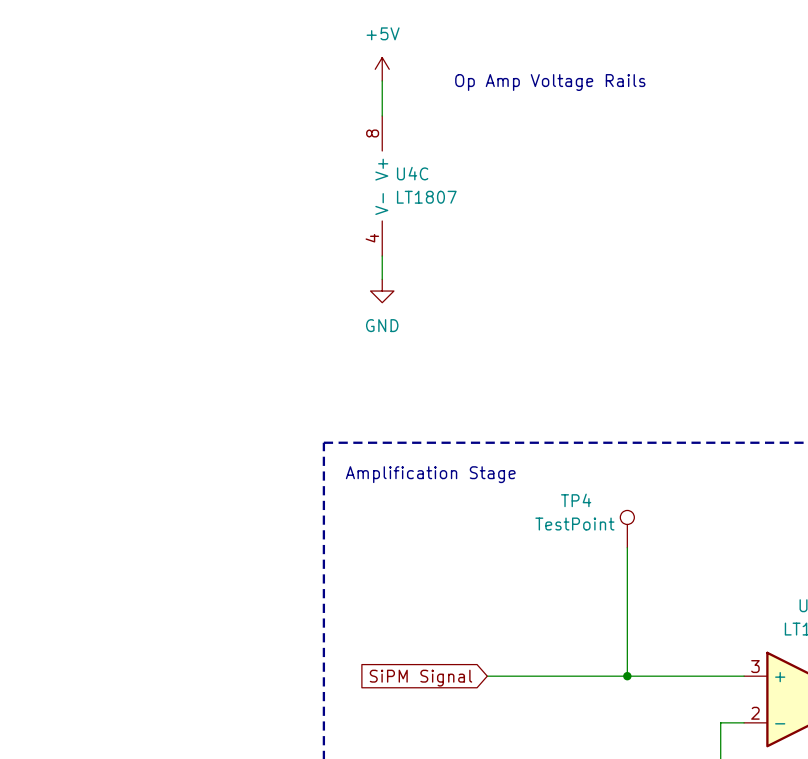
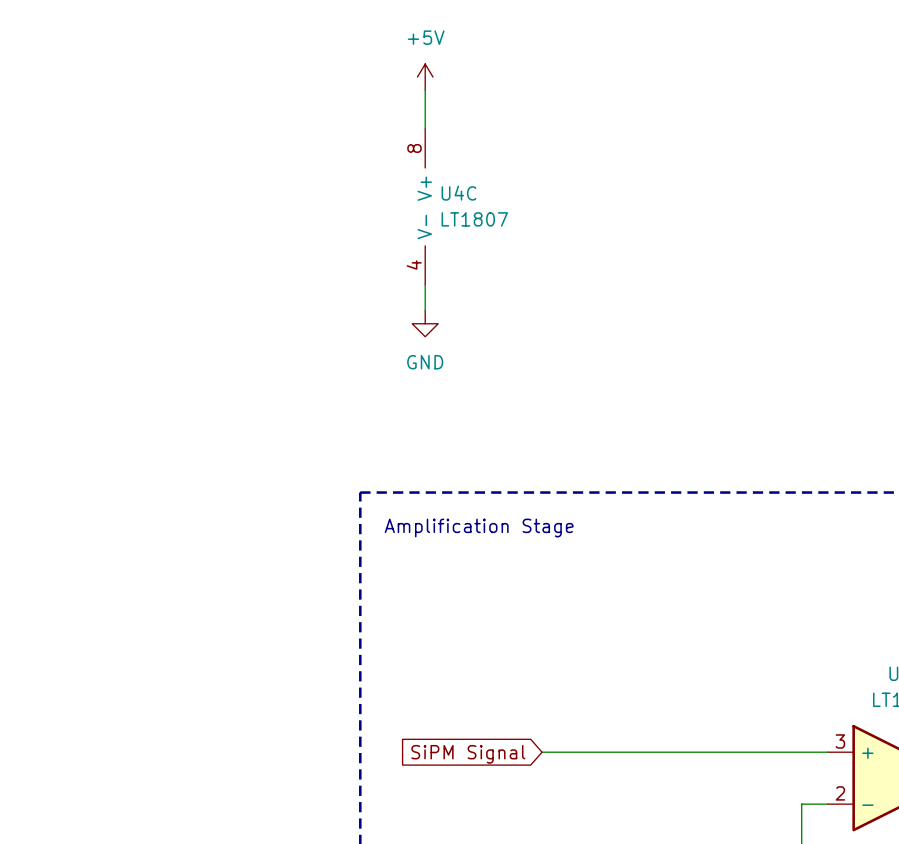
text: Op Amp Voltage Rails (550, 82) -> none
TP4: TestPoint (627, 529) -> none
wire: (627, 547) (627, 676) -> none
junction: (627, 676) -> none

